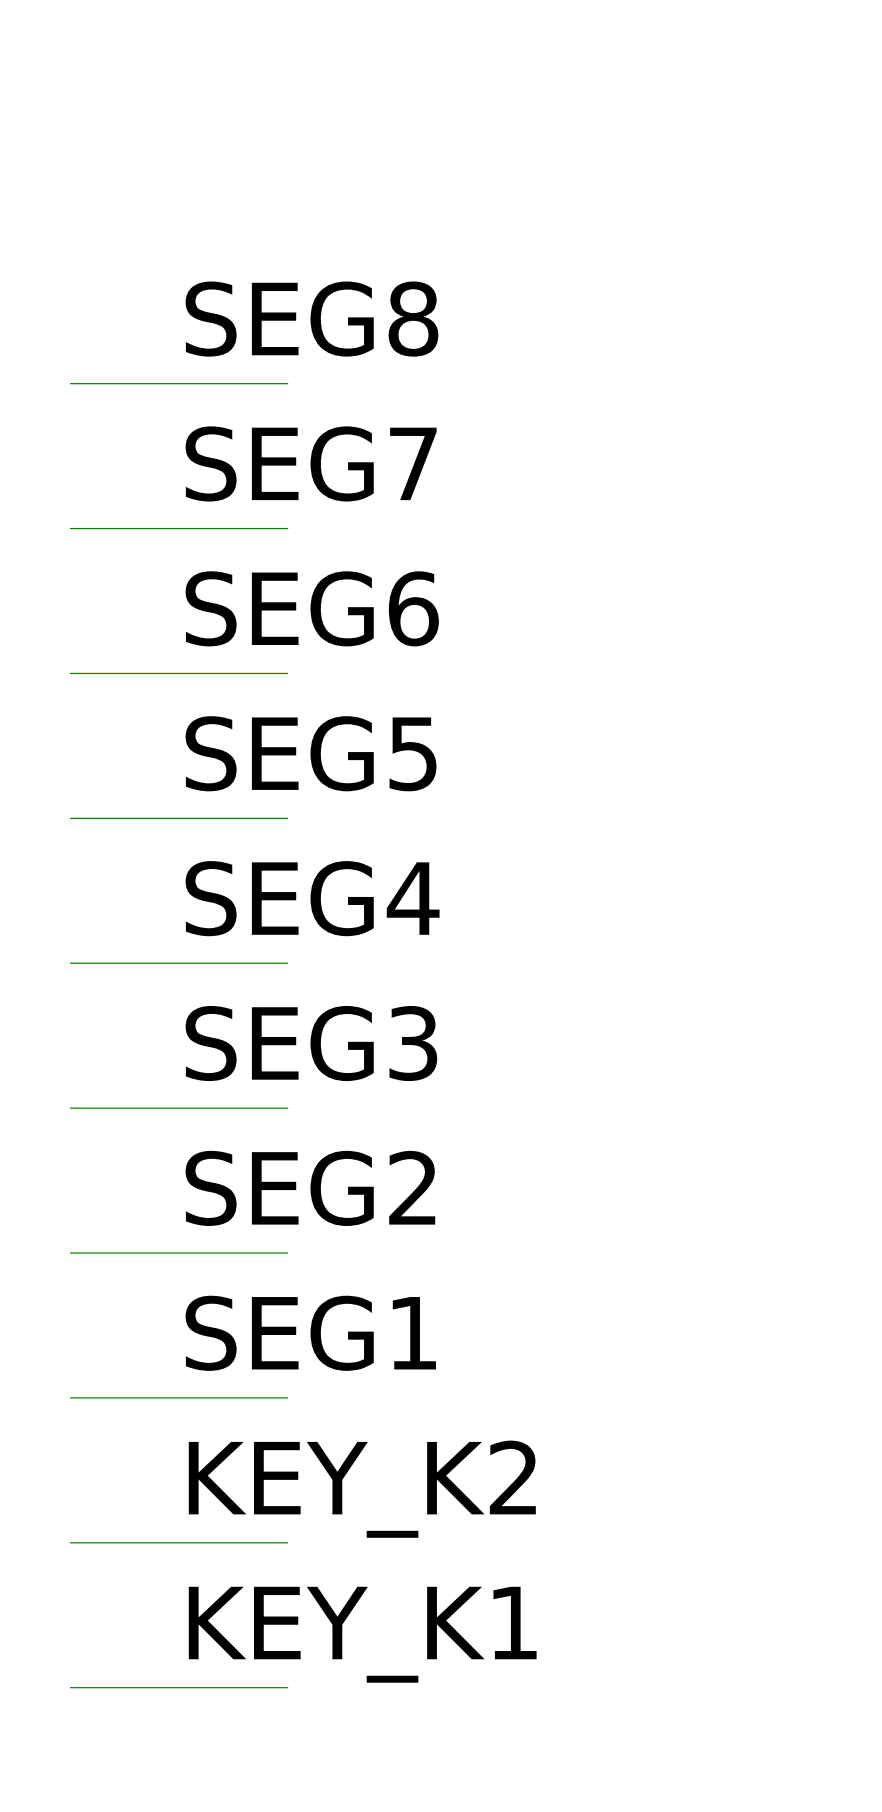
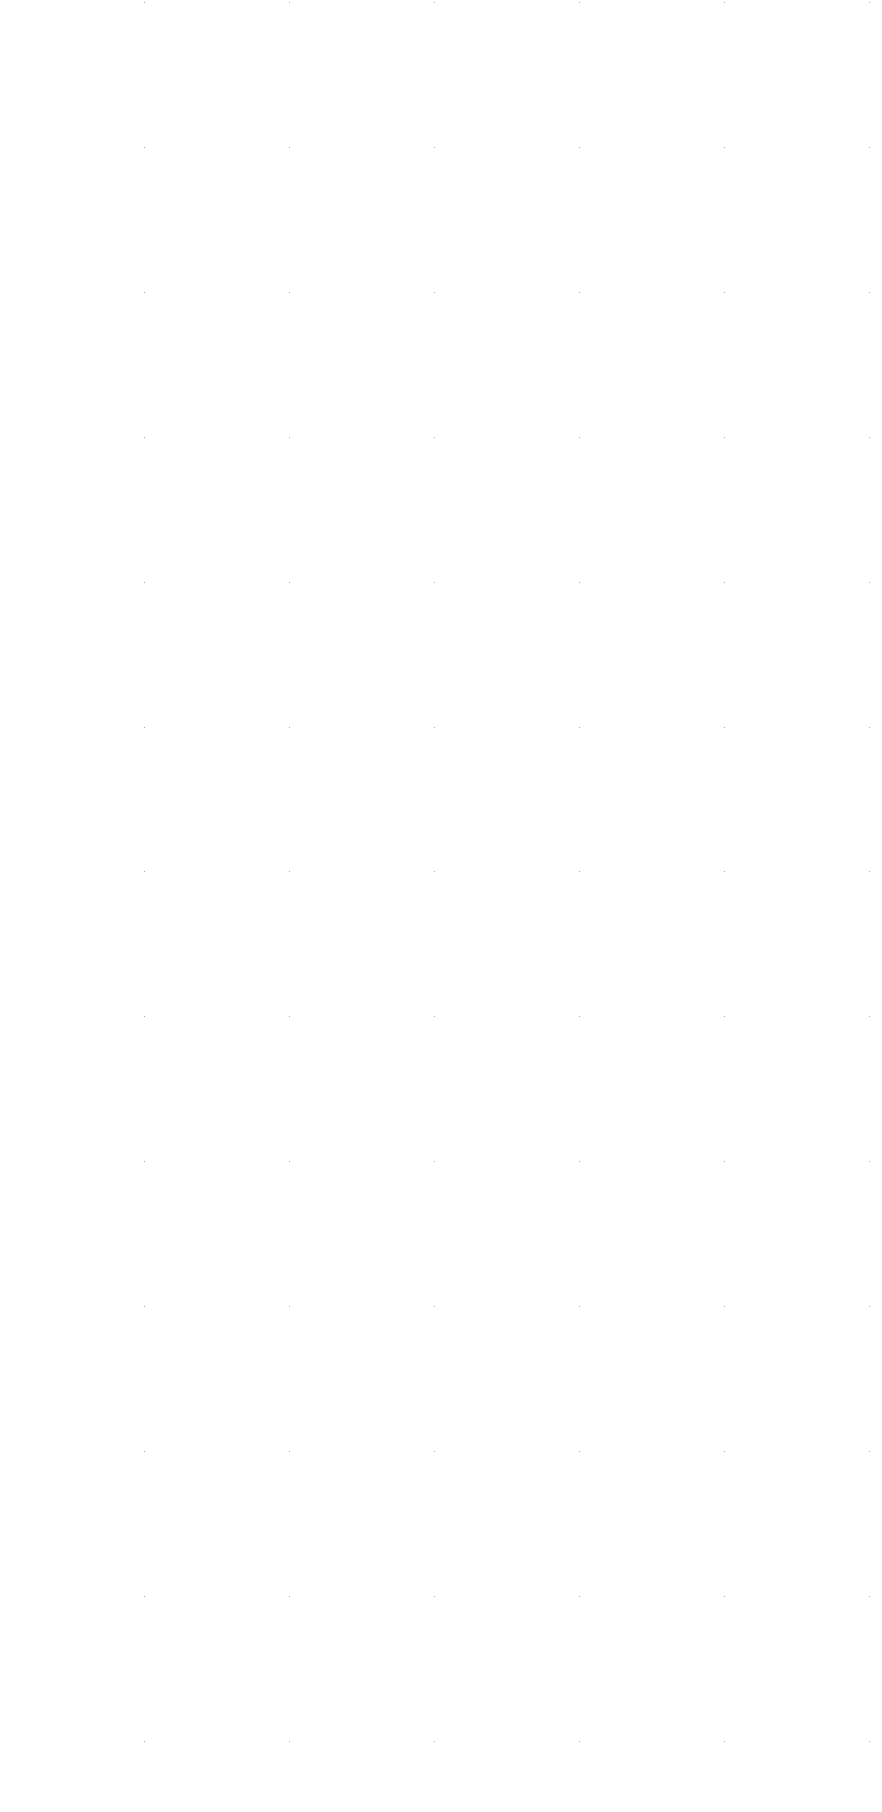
label: SEG8 (311, 319) -> none
wire: (70, 383) (287, 383) -> none
label: SEG7 (311, 463) -> none
wire: (70, 528) (287, 528) -> none
label: SEG6 (312, 608) -> none
wire: (70, 673) (287, 673) -> none
label: SEG5 (311, 753) -> none
wire: (70, 818) (287, 818) -> none
label: SEG4 (312, 898) -> none
wire: (70, 963) (287, 963) -> none
label: SEG3 (311, 1043) -> none
wire: (70, 1108) (287, 1108) -> none
label: SEG2 (310, 1188) -> none
wire: (70, 1253) (287, 1253) -> none
label: SEG1 (310, 1333) -> none
wire: (70, 1397) (287, 1397) -> none
label: KEY_K2 (362, 1489) -> none
wire: (70, 1542) (287, 1542) -> none
label: KEY_K1 (362, 1634) -> none
wire: (70, 1687) (287, 1687) -> none

